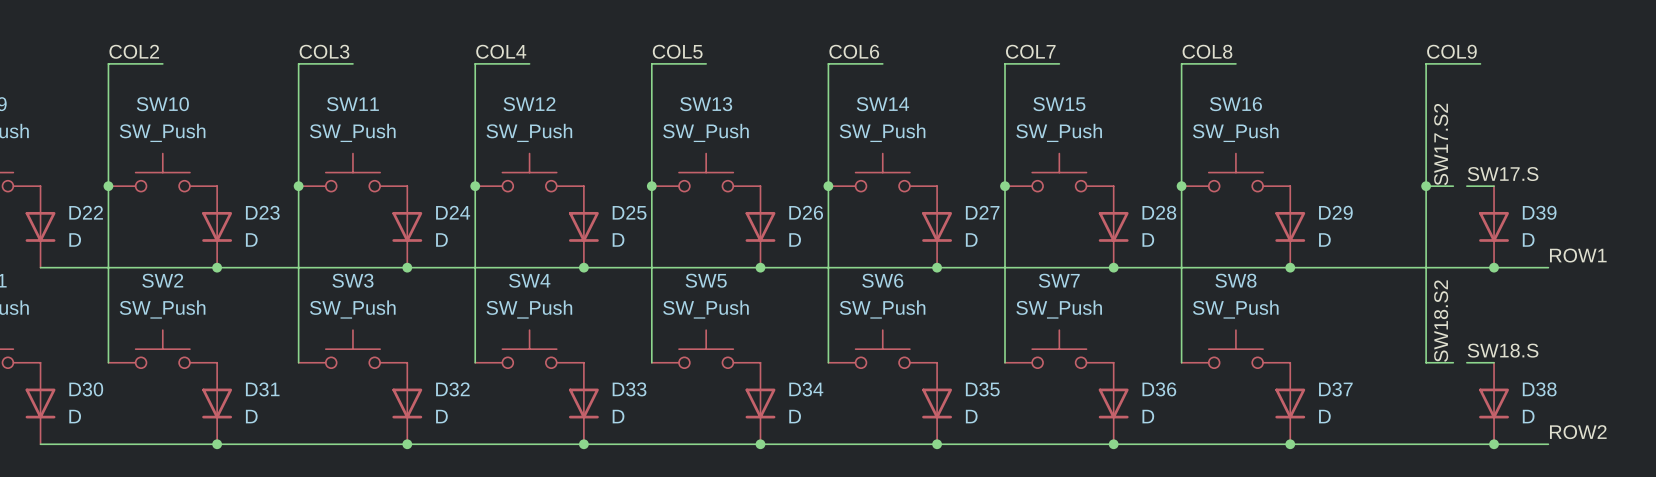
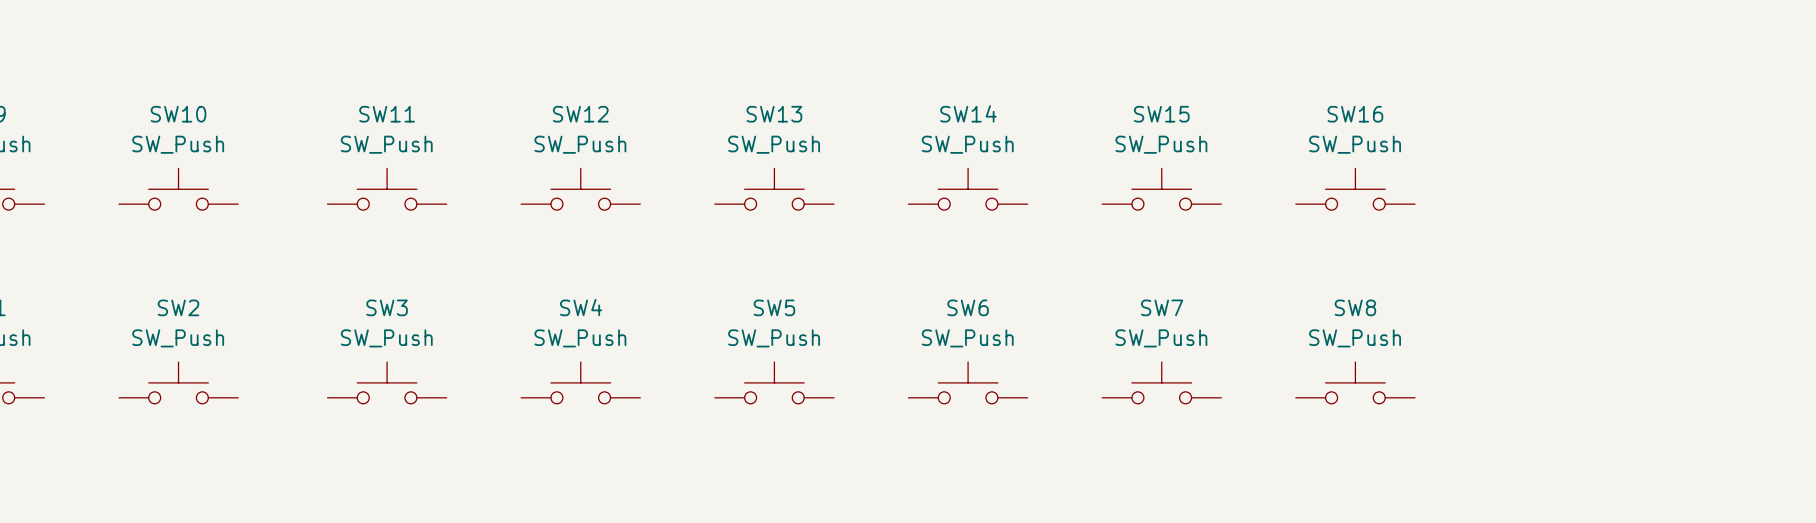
label: COL2 (134, 51) -> none
label: COL3 (324, 51) -> none
label: COL4 (501, 51) -> none
label: COL5 (677, 51) -> none
label: COL6 (854, 51) -> none
label: COL7 (1030, 51) -> none
label: COL8 (1207, 51) -> none
label: COL9 (1451, 51) -> none
wire: (162, 63) (108, 63) (108, 362) -> none
wire: (352, 63) (298, 63) (298, 362) -> none
wire: (529, 63) (475, 63) (475, 362) -> none
wire: (706, 63) (651, 63) (651, 362) -> none
wire: (882, 63) (828, 63) (828, 362) -> none
wire: (1059, 63) (1005, 63) (1005, 362) -> none
wire: (1235, 63) (1181, 63) (1181, 362) -> none
wire: (1480, 63) (1426, 63) (1426, 362) (1453, 362) -> none
label: SW17.S2 (1441, 144) -> none
label: SW17.S (1503, 174) -> none
junction: (108, 186) -> none
junction: (298, 186) -> none
junction: (475, 186) -> none
junction: (651, 186) -> none
junction: (828, 186) -> none
junction: (1005, 186) -> none
junction: (1181, 186) -> none
wire: (1426, 186) (1453, 186) -> none
junction: (1426, 186) -> none
wire: (1466, 186) (1494, 186) -> none
D22: D (40, 226) -> none
D23: D (217, 226) -> none
D24: D (407, 226) -> none
D25: D (583, 226) -> none
D26: D (760, 226) -> none
D27: D (937, 226) -> none
D28: D (1113, 226) -> none
D29: D (1290, 226) -> none
D39: D (1494, 226) -> none
label: ROW1 (1578, 255) -> none
wire: (40, 267) (1548, 267) -> none
junction: (217, 267) -> none
junction: (407, 267) -> none
junction: (583, 267) -> none
junction: (760, 267) -> none
junction: (937, 267) -> none
junction: (1113, 267) -> none
junction: (1290, 267) -> none
junction: (1494, 267) -> none
label: SW18.S2 (1441, 321) -> none
label: SW18.S (1503, 350) -> none
wire: (1466, 362) (1494, 362) -> none
D30: D (40, 403) -> none
D31: D (217, 403) -> none
D32: D (407, 403) -> none
D33: D (583, 403) -> none
D34: D (760, 403) -> none
D35: D (937, 403) -> none
D36: D (1113, 403) -> none
D37: D (1290, 403) -> none
D38: D (1494, 403) -> none
label: ROW2 (1578, 432) -> none
wire: (40, 444) (1548, 444) -> none
junction: (217, 444) -> none
junction: (407, 444) -> none
junction: (583, 444) -> none
junction: (760, 444) -> none
junction: (937, 444) -> none
junction: (1113, 444) -> none
junction: (1290, 444) -> none
junction: (1494, 444) -> none

